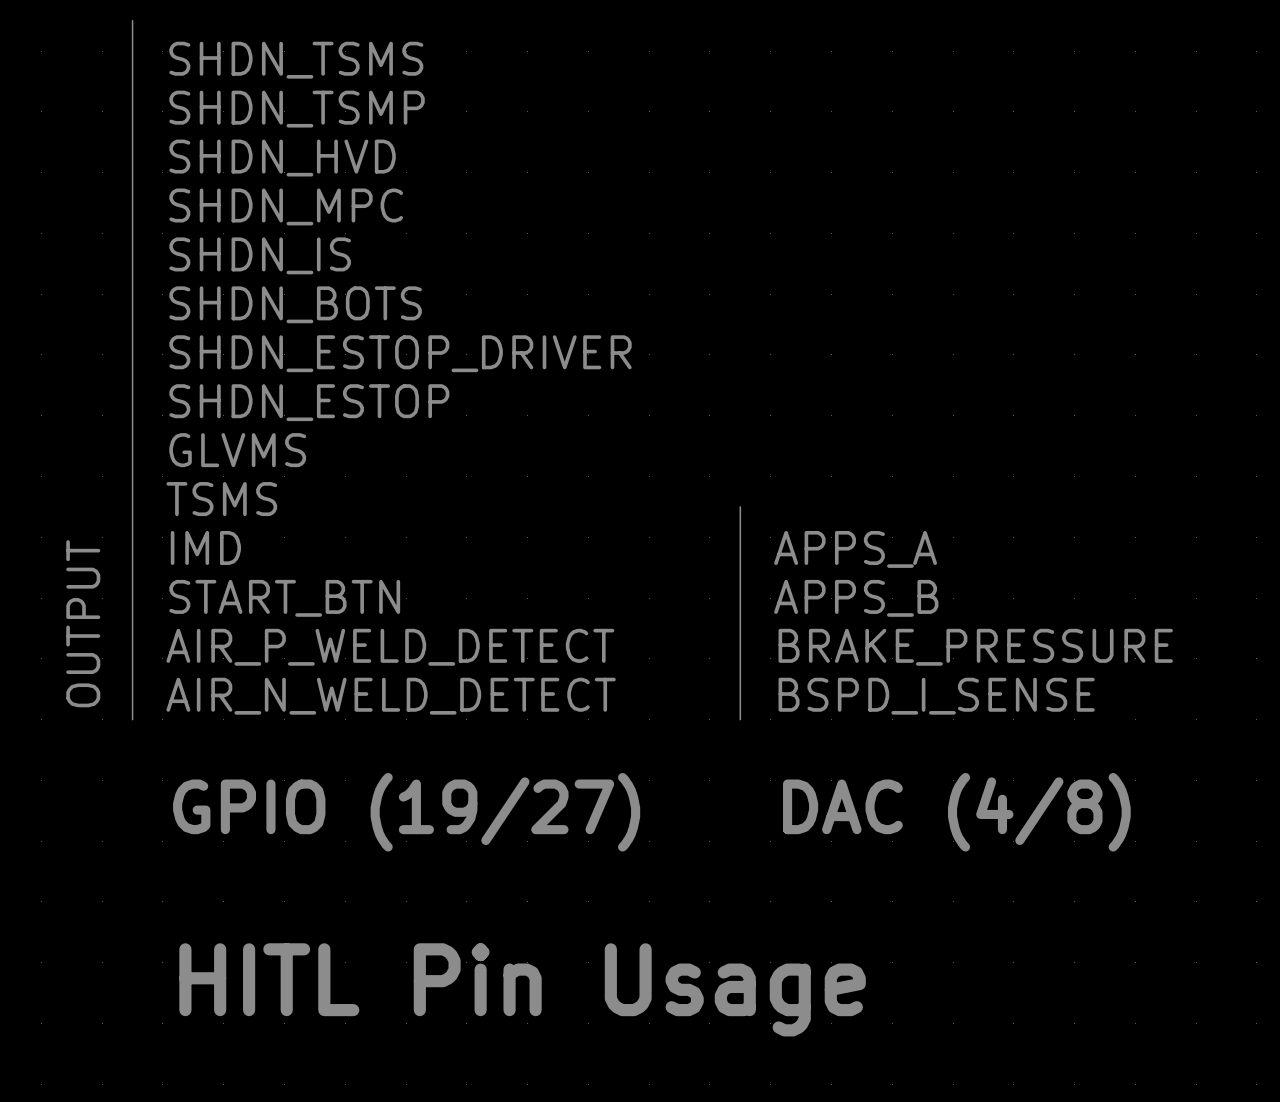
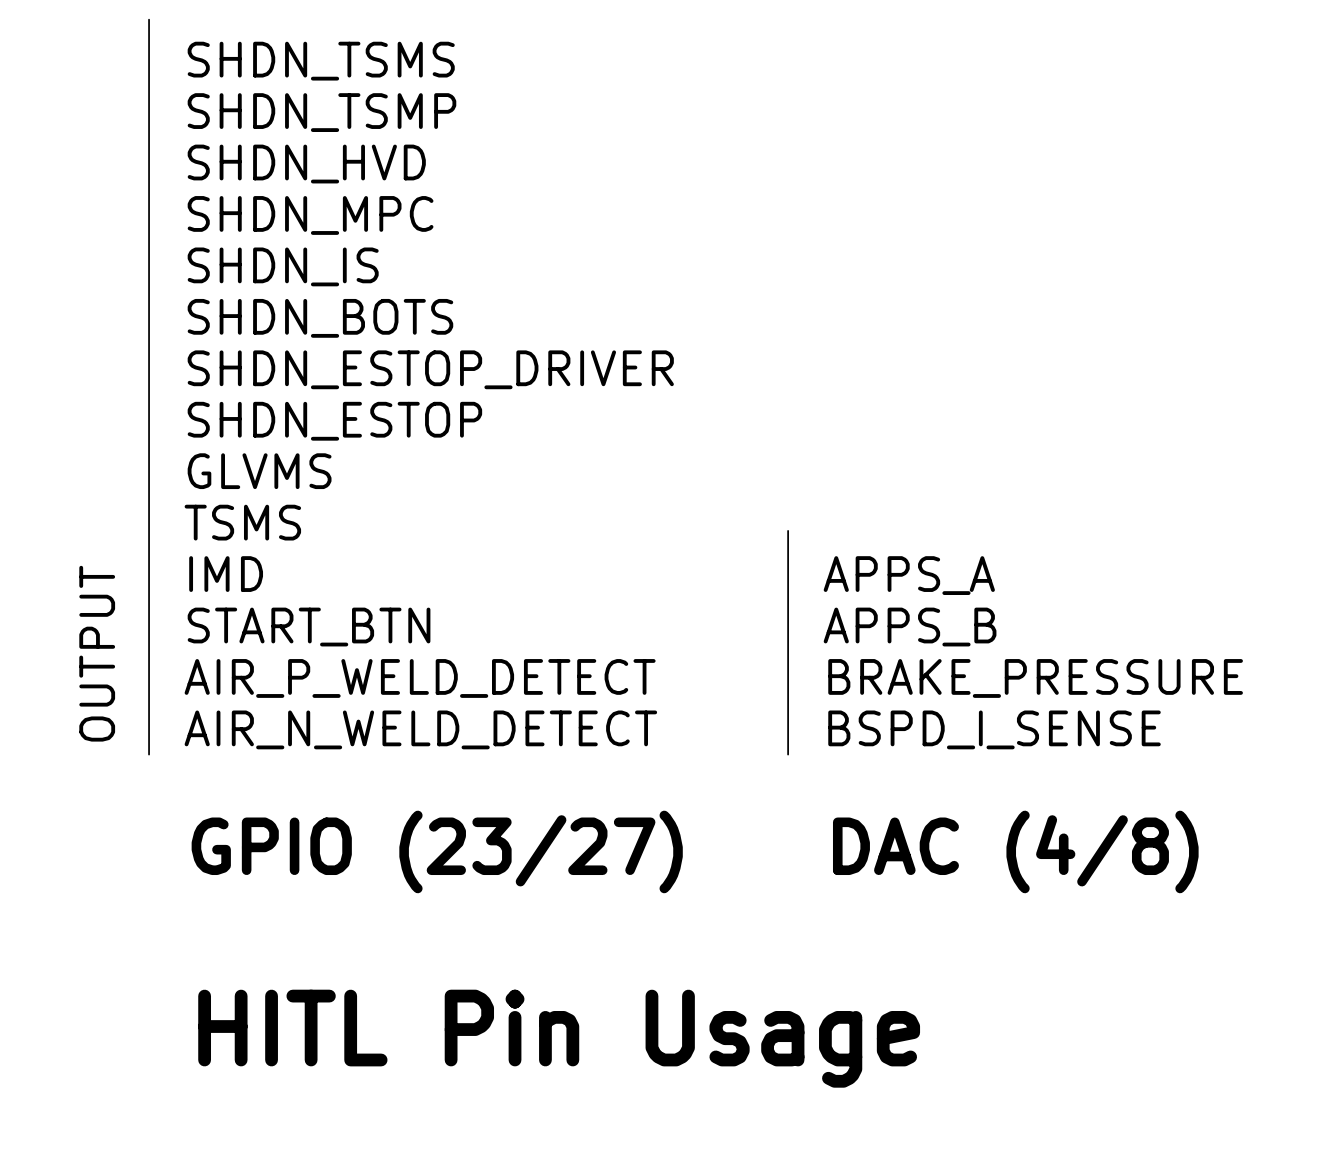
text: GPIO (19/27) (406, 812) -> GPIO (23/27) (437, 851)

